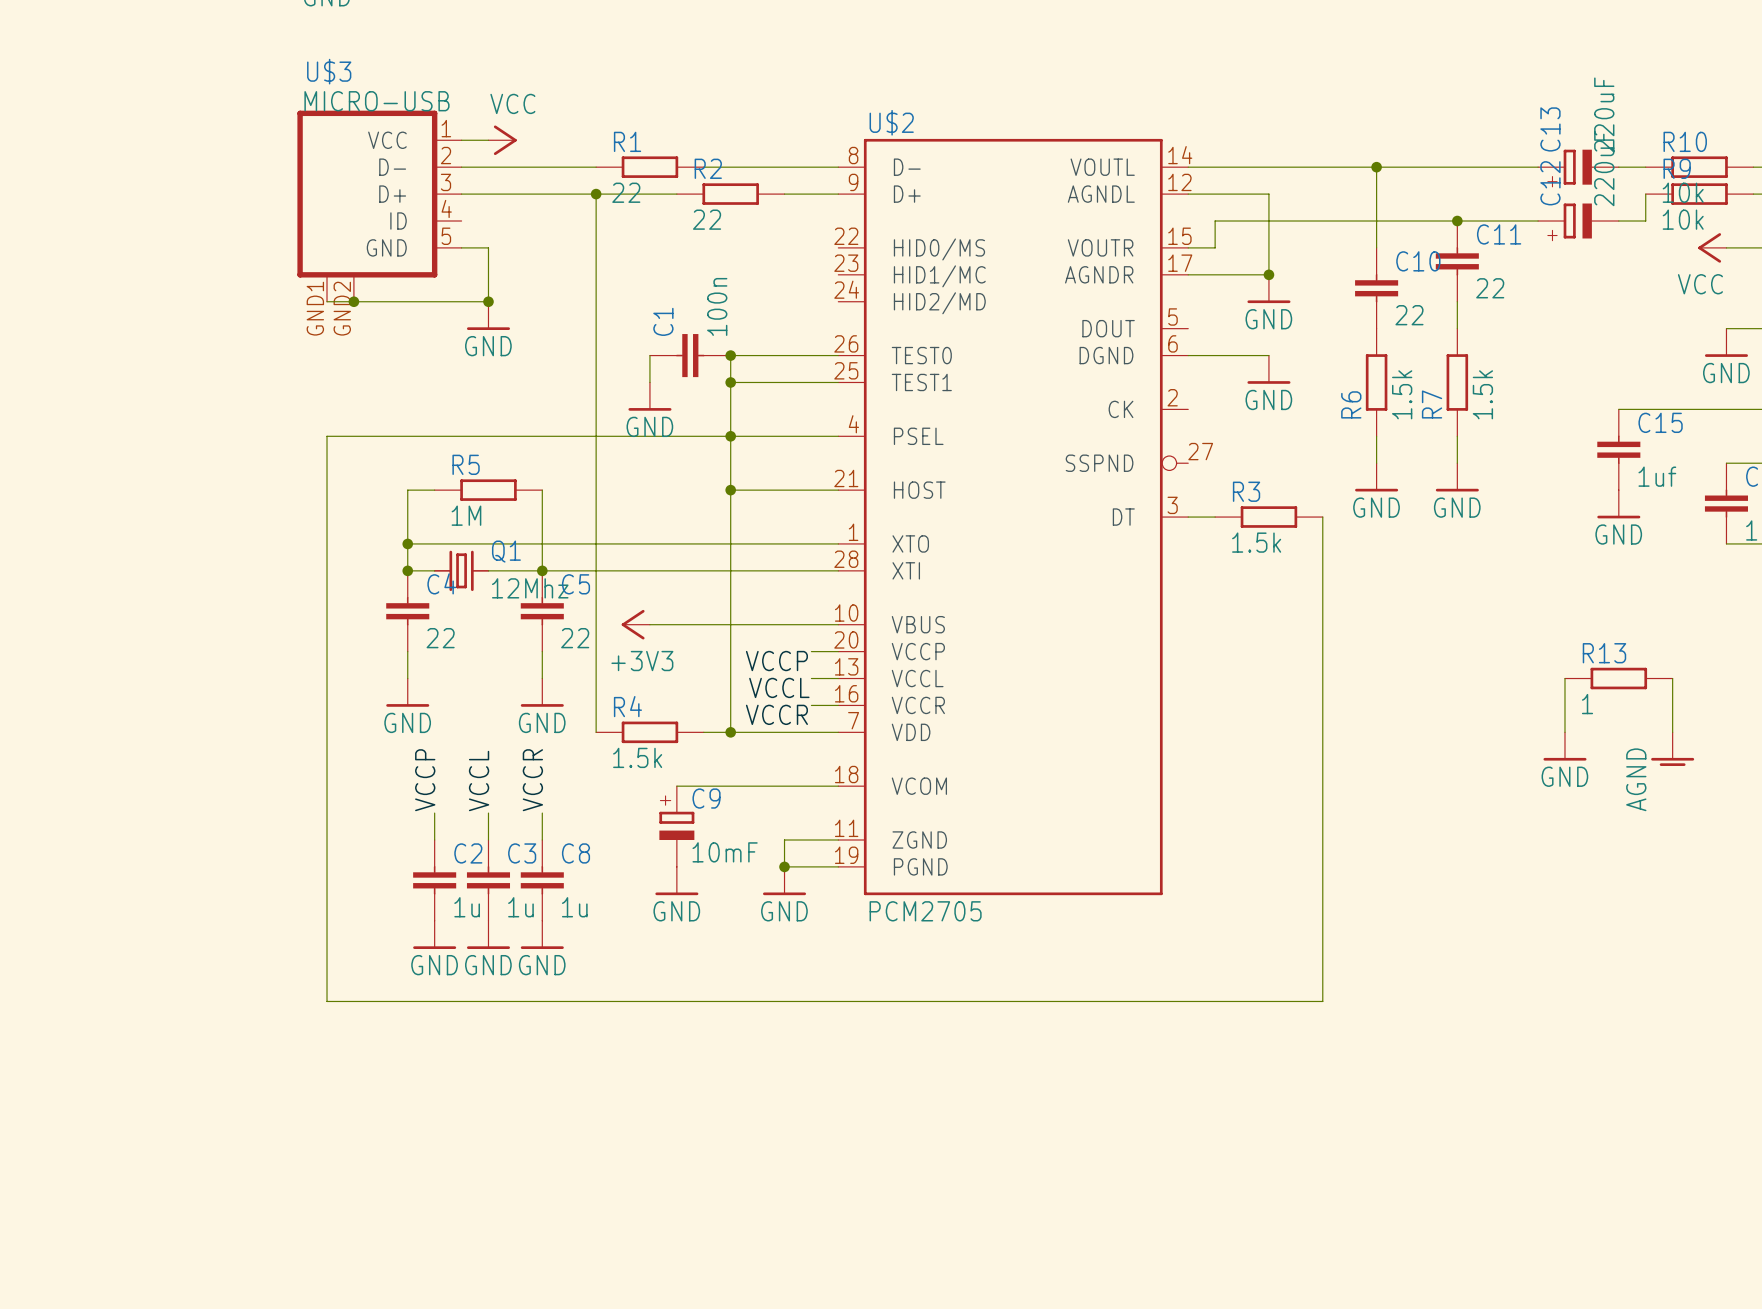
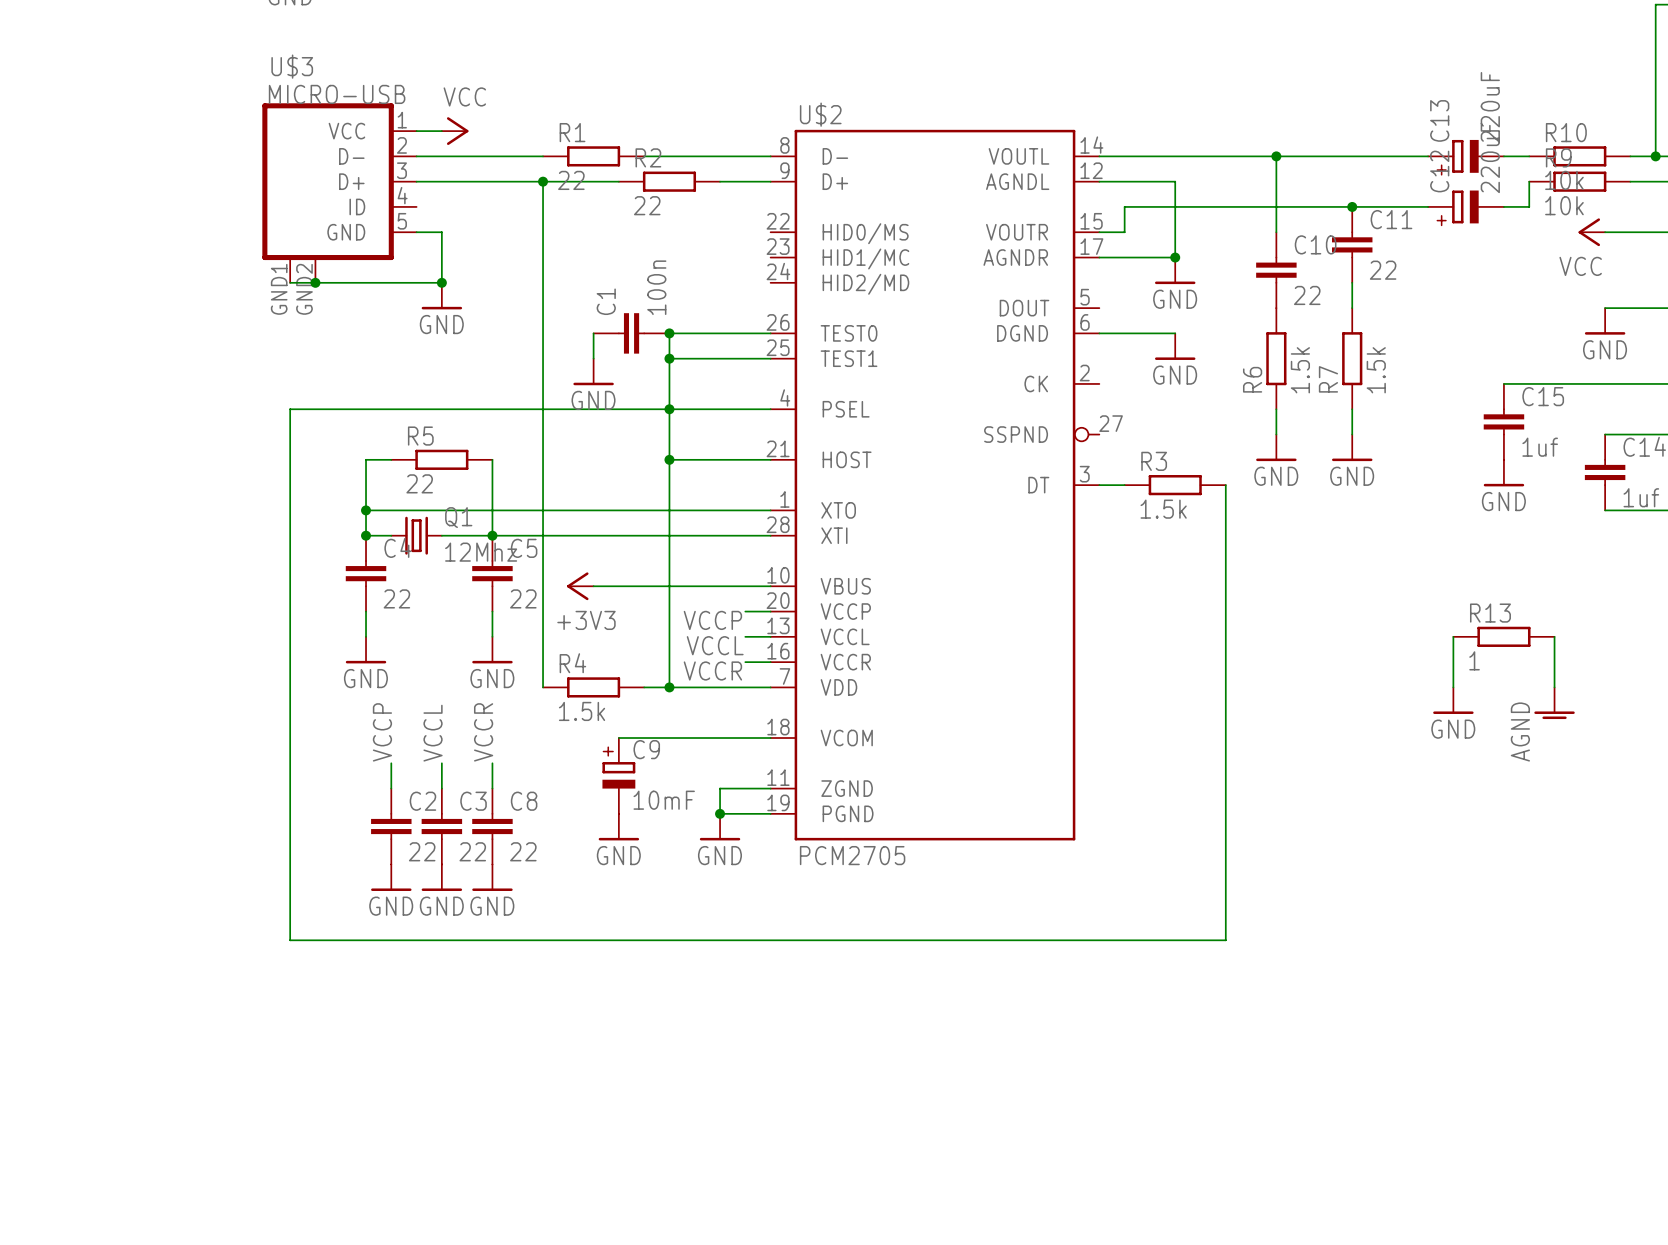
R5 value: 1M (466, 515) -> 22 (419, 483)
C2 value: 1u (467, 907) -> 22 (422, 851)
C3 value: 1u (520, 907) -> 22 (472, 851)
C8 value: 1u (574, 907) -> 22 (523, 851)

